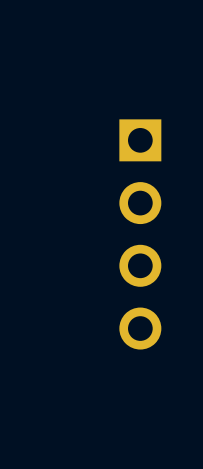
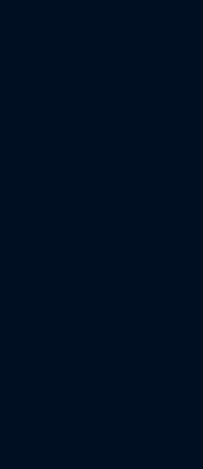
part: (140, 234) -> none

